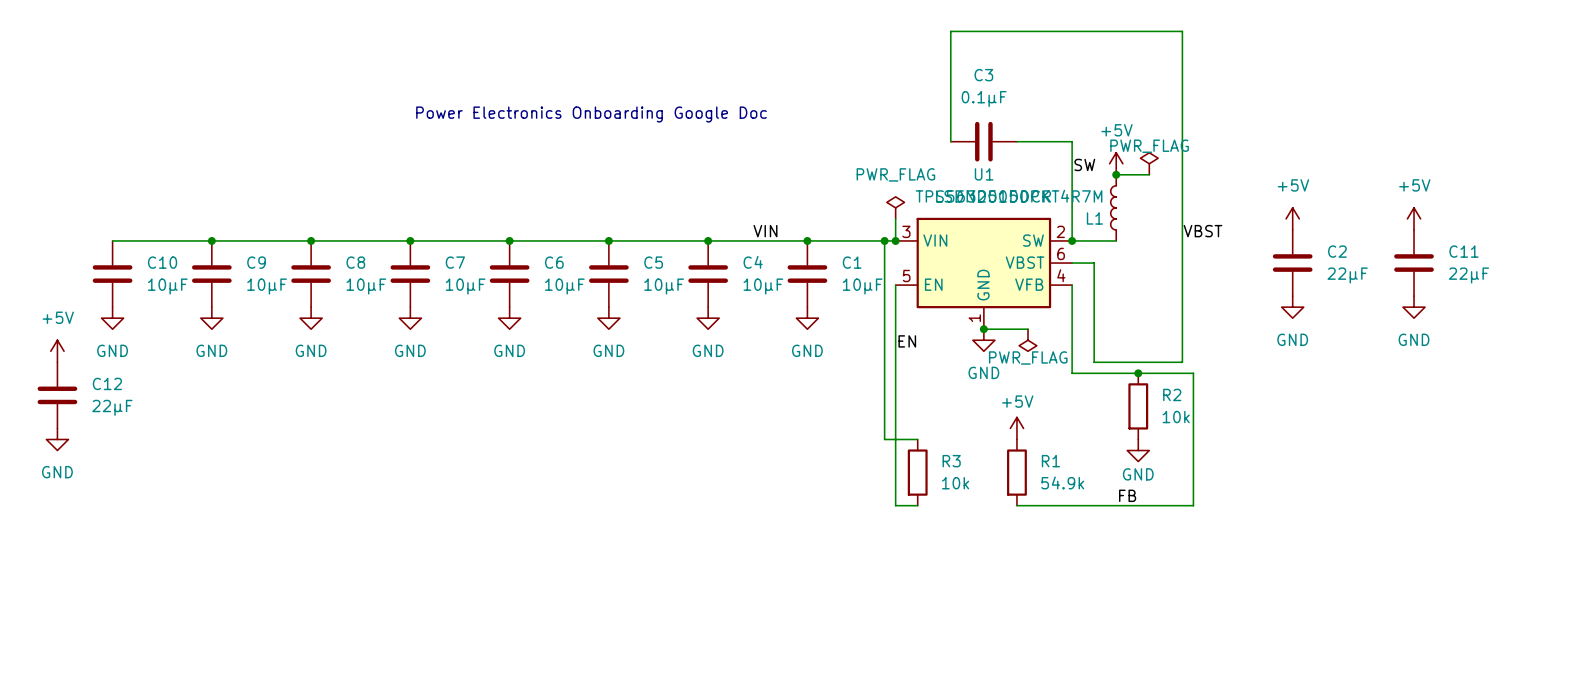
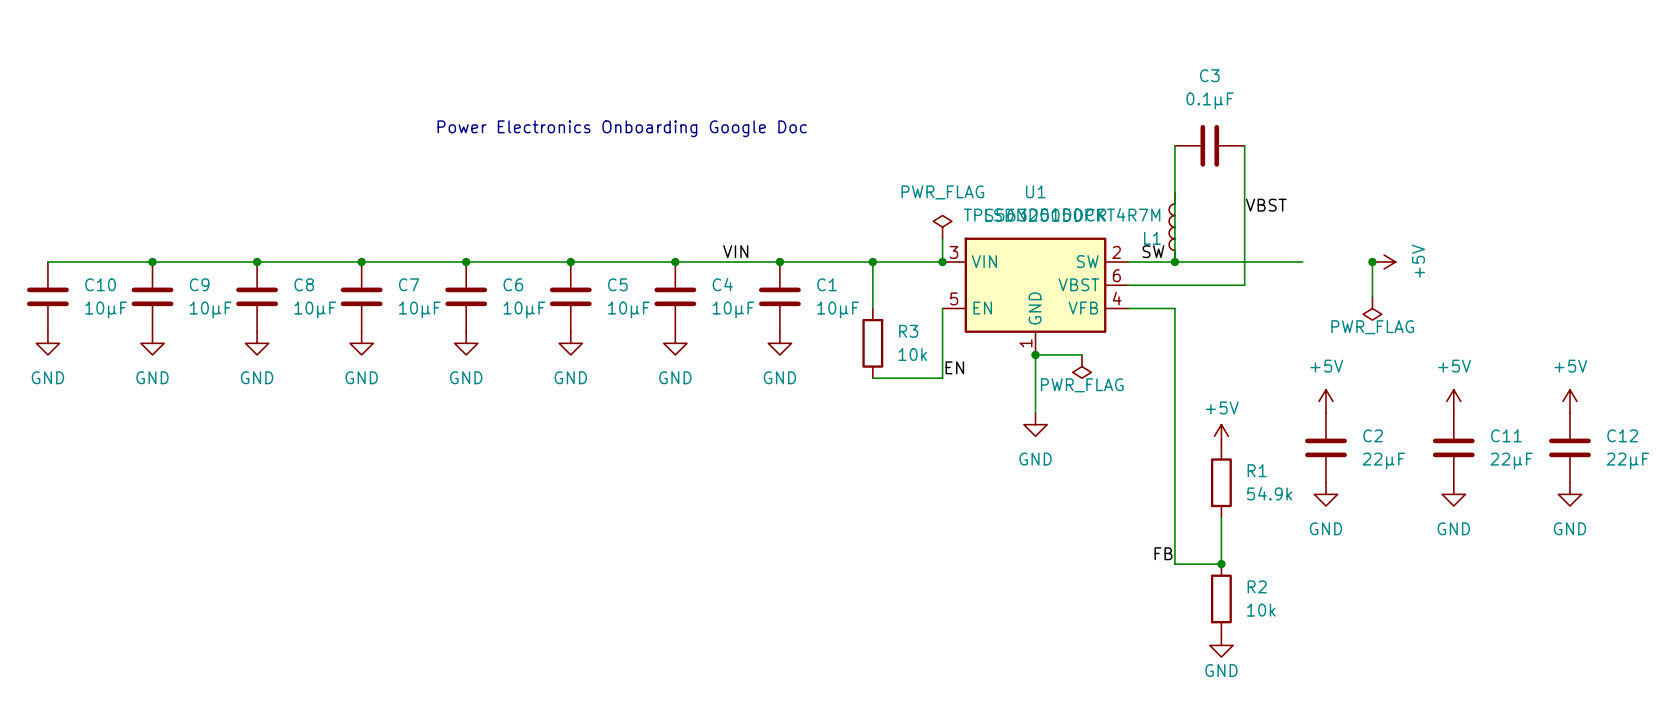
wire: none -> (1174, 145) (1174, 262) (1302, 262)
wire: (1182, 130) (1182, 31) (950, 31) (950, 141) -> none
C3 position: (983, 141) -> (1209, 145)
wire: (1016, 141) (1072, 141) (1072, 240) -> none
power symbol: +5V (1116, 163) -> none
power symbol rotation: 0° (1149, 163) -> 180° (1372, 308)
power symbol position: PWR_FLAG (1149, 163) -> PWR_FLAG (1372, 308)
label position: SW (1084, 164) -> SW (1153, 251)
wire: (1116, 174) (1149, 174) -> none
junction: (1116, 174) -> none
power symbol rotation: 0° (1292, 218) -> 90° clockwise (1384, 262)
power symbol position: +5V (1292, 218) -> +5V (1384, 262)
power symbol: +5V (1414, 218) -> none
label position: VIN (765, 231) -> VIN (735, 251)
label position: VBST (1202, 231) -> VBST (1266, 205)
wire: none -> (47, 262) (117, 262)
junction: none -> (152, 262)
junction: (211, 240) -> none
junction: none -> (257, 262)
junction: (311, 240) -> none
junction: none -> (361, 262)
junction: (410, 240) -> none
junction: none -> (466, 262)
junction: (509, 240) -> none
junction: none -> (570, 262)
junction: (608, 240) -> none
junction: none -> (675, 262)
junction: (708, 240) -> none
junction: none -> (779, 262)
junction position: (807, 240) -> (872, 262)
wire: none -> (872, 262) (872, 308)
wire: (884, 240) (884, 439) (917, 439) -> none
junction: (884, 240) -> none
junction: (1072, 240) -> none
junction: none -> (1174, 262)
wire: none -> (1372, 262) (1372, 296)
junction: none -> (1372, 262)
wire: (1094, 263) (1094, 362) (1182, 362) (1182, 263) -> (1151, 285) (1244, 285)
C2 position: (1292, 263) -> (1325, 447)
C11 position: (1414, 263) -> (1453, 447)
C10 position: (112, 274) -> (47, 296)
C9 position: (211, 274) -> (152, 296)
C8 position: (311, 274) -> (257, 296)
C7 position: (410, 274) -> (361, 296)
C6 position: (509, 274) -> (466, 296)
C5 position: (608, 274) -> (570, 296)
C4 position: (708, 274) -> (675, 296)
C1 position: (807, 274) -> (779, 296)
wire: (1072, 285) (1072, 373) (1193, 373) (1193, 505) (1016, 505) -> (1128, 308) (1174, 308) (1174, 564) (1221, 564) (1221, 517)
power symbol: GND (1292, 307) -> none
power symbol: GND (1414, 307) -> none
power symbol: none -> GND (47, 343)
power symbol: GND (112, 318) -> none
power symbol: none -> GND (152, 343)
power symbol: GND (211, 318) -> none
power symbol: none -> GND (257, 343)
power symbol: GND (311, 318) -> none
power symbol: none -> GND (361, 343)
power symbol: GND (410, 318) -> none
power symbol: none -> GND (466, 343)
power symbol: GND (509, 318) -> none
power symbol: none -> GND (570, 343)
power symbol: GND (608, 318) -> none
power symbol: none -> GND (675, 343)
power symbol: GND (708, 318) -> none
power symbol: none -> GND (779, 343)
power symbol: GND (807, 318) -> none
wire: none -> (1035, 354) (1035, 413)
power symbol position: GND (983, 340) -> GND (1035, 424)
power symbol: +5V (57, 351) -> none
wire: (895, 351) (895, 505) (917, 505) -> (942, 378) (872, 378)
junction: (1138, 373) -> none
power symbol: none -> +5V (1325, 401)
power symbol: none -> +5V (1453, 401)
power symbol: none -> +5V (1569, 401)
C12 position: (57, 395) -> (1569, 447)
R2 position: (1138, 406) -> (1221, 598)
power symbol: none -> +5V (1221, 436)
power symbol: +5V (1016, 428) -> none
power symbol: GND (57, 439) -> none
power symbol: GND (1138, 450) -> none
power symbol: none -> GND (1325, 494)
power symbol: none -> GND (1453, 494)
power symbol: none -> GND (1569, 494)
R3 position: (917, 472) -> (872, 343)
R1 position: (1016, 472) -> (1221, 482)
label position: FB (1127, 495) -> FB (1163, 553)
junction: none -> (1221, 564)
power symbol: none -> GND (1221, 645)

